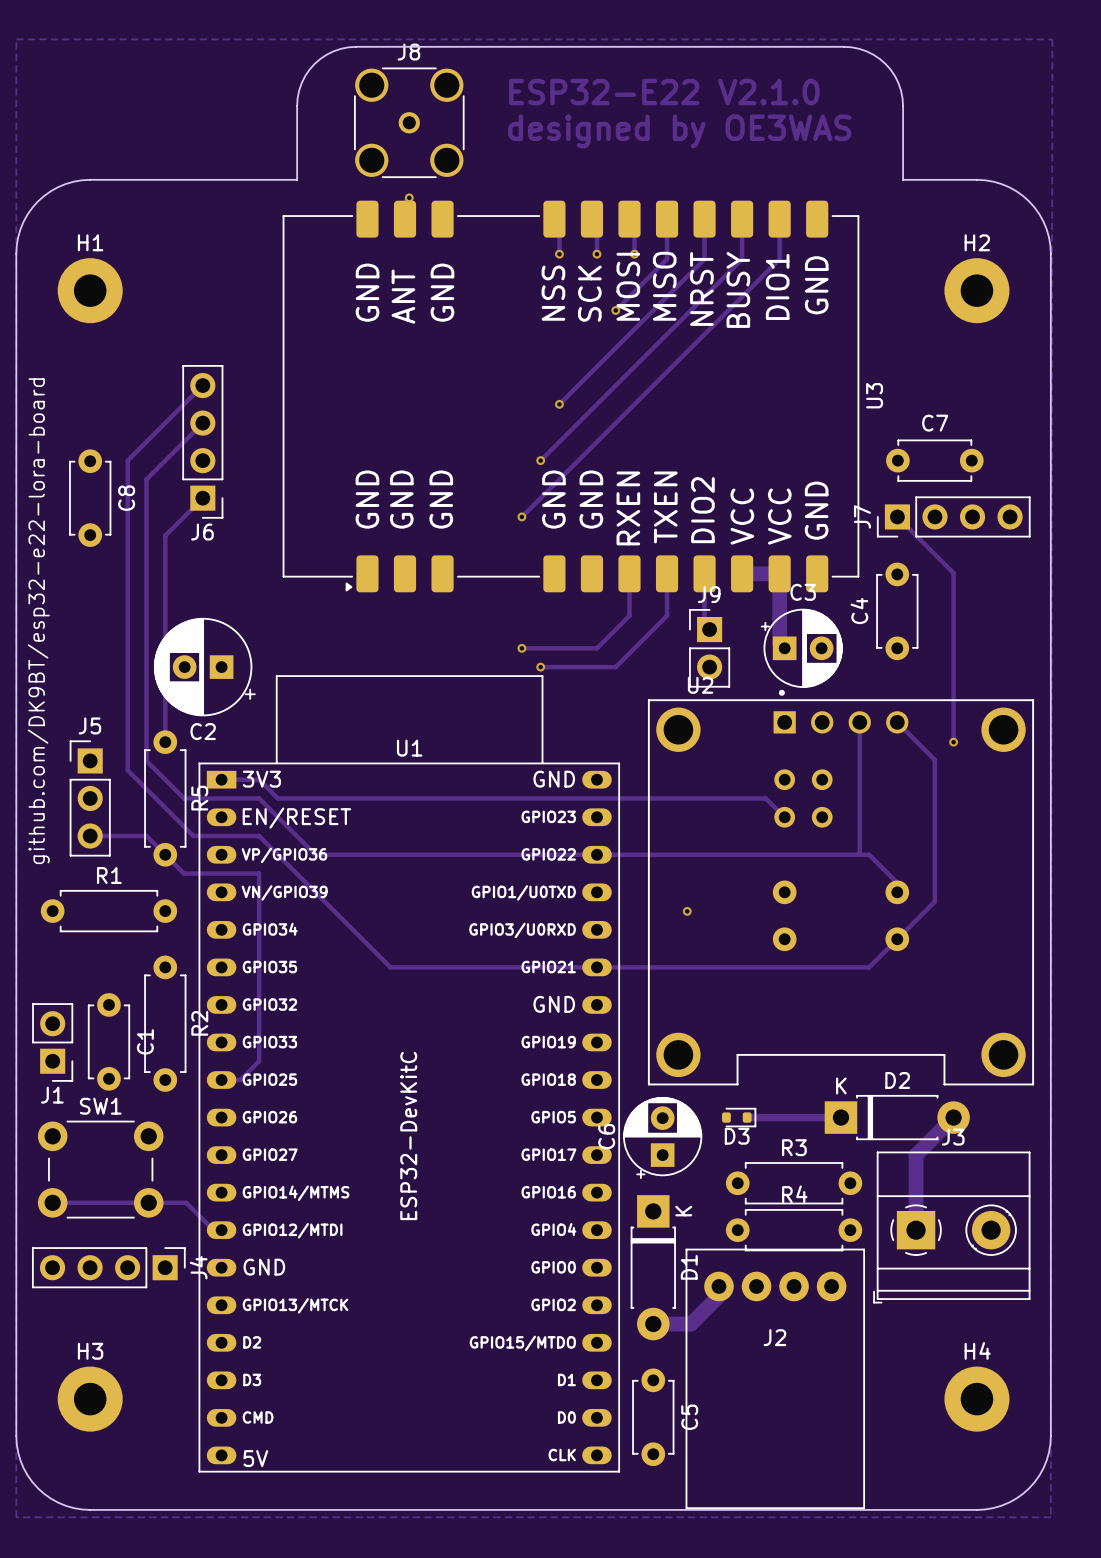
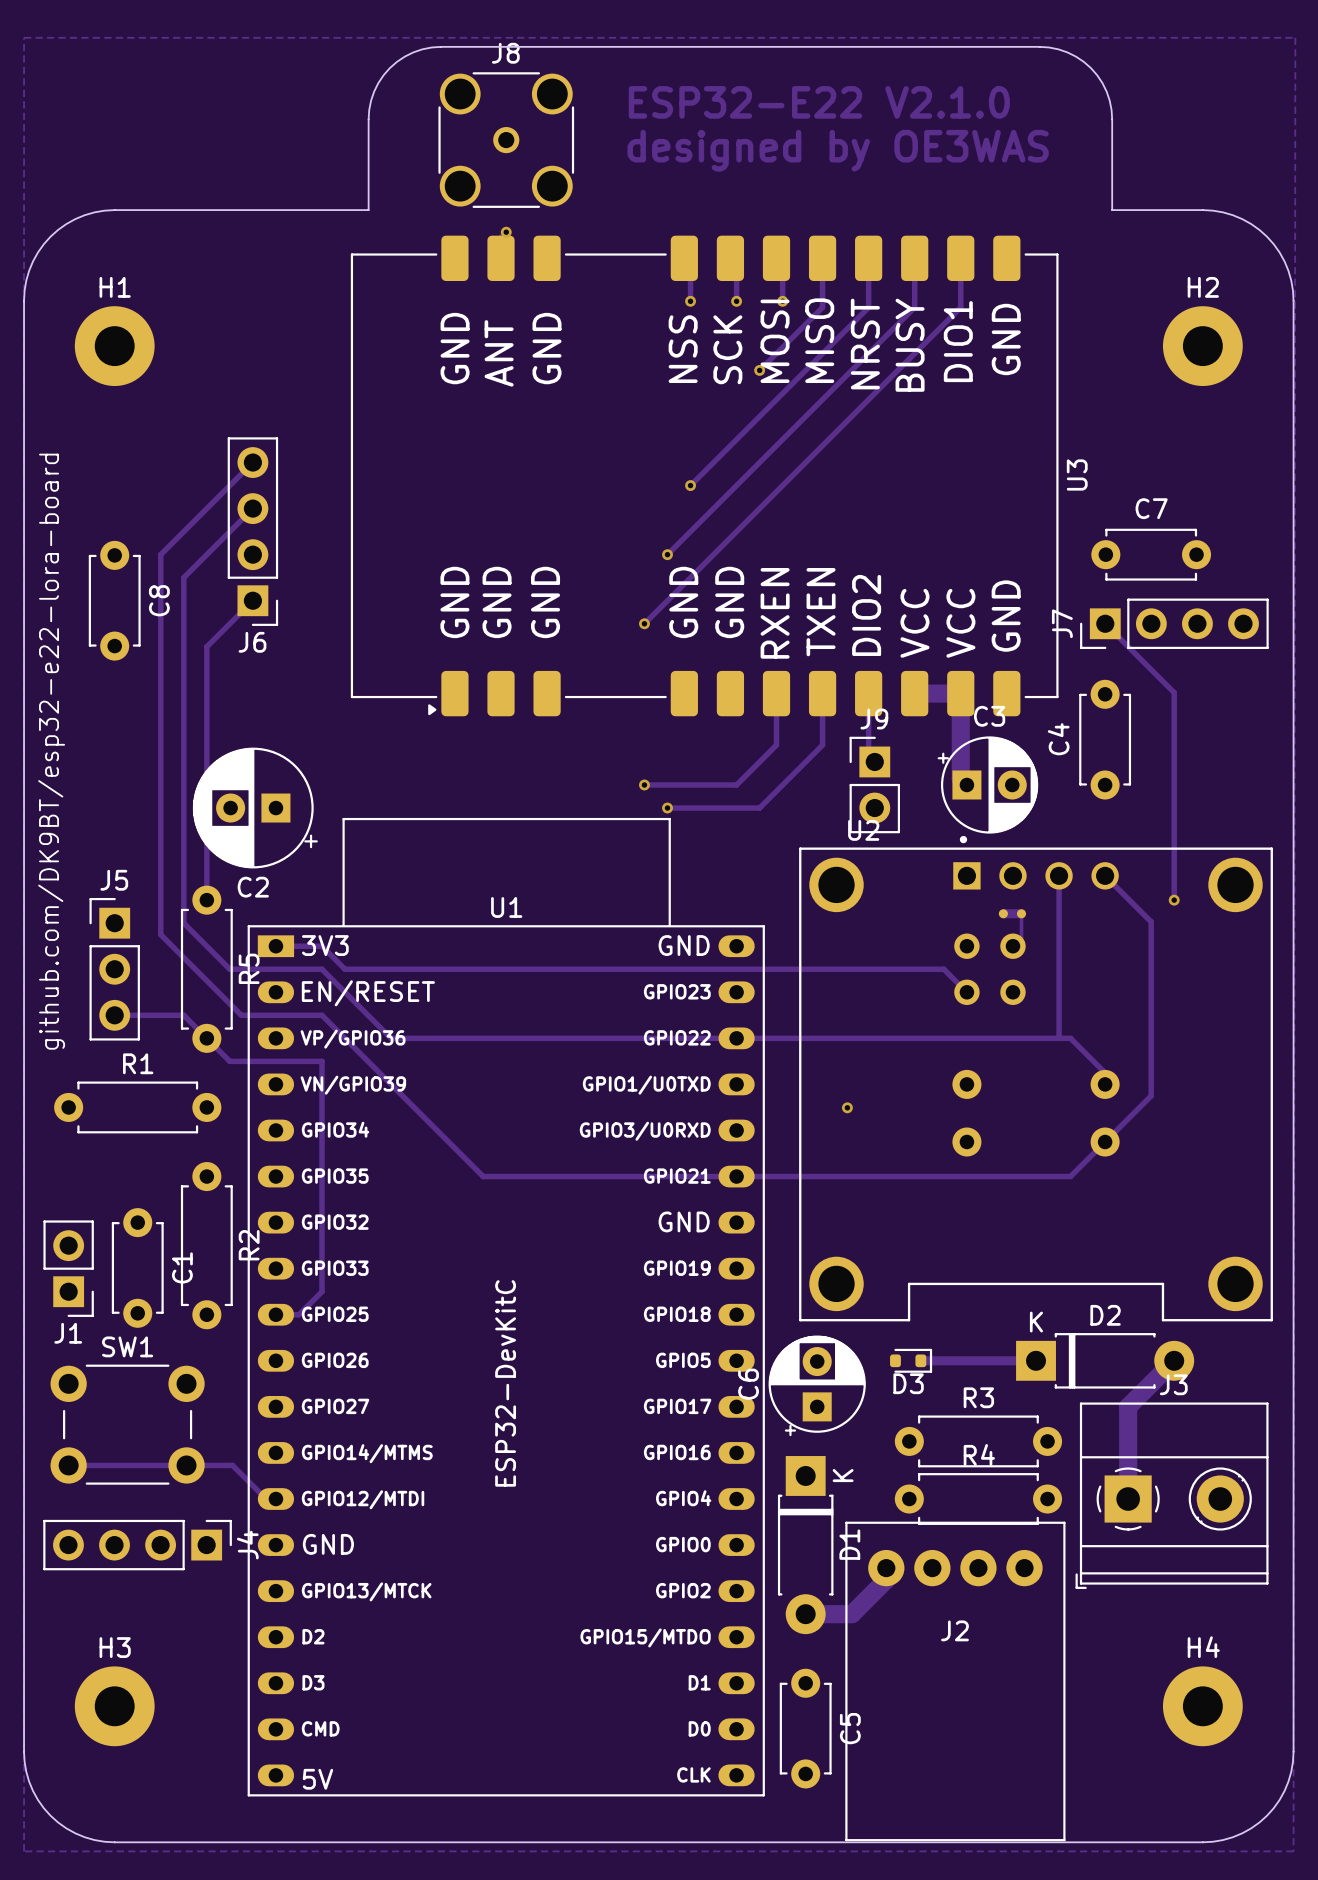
part: none -> (1012, 913)
track: none -> (1021, 913) (1021, 937) (1012, 946)

